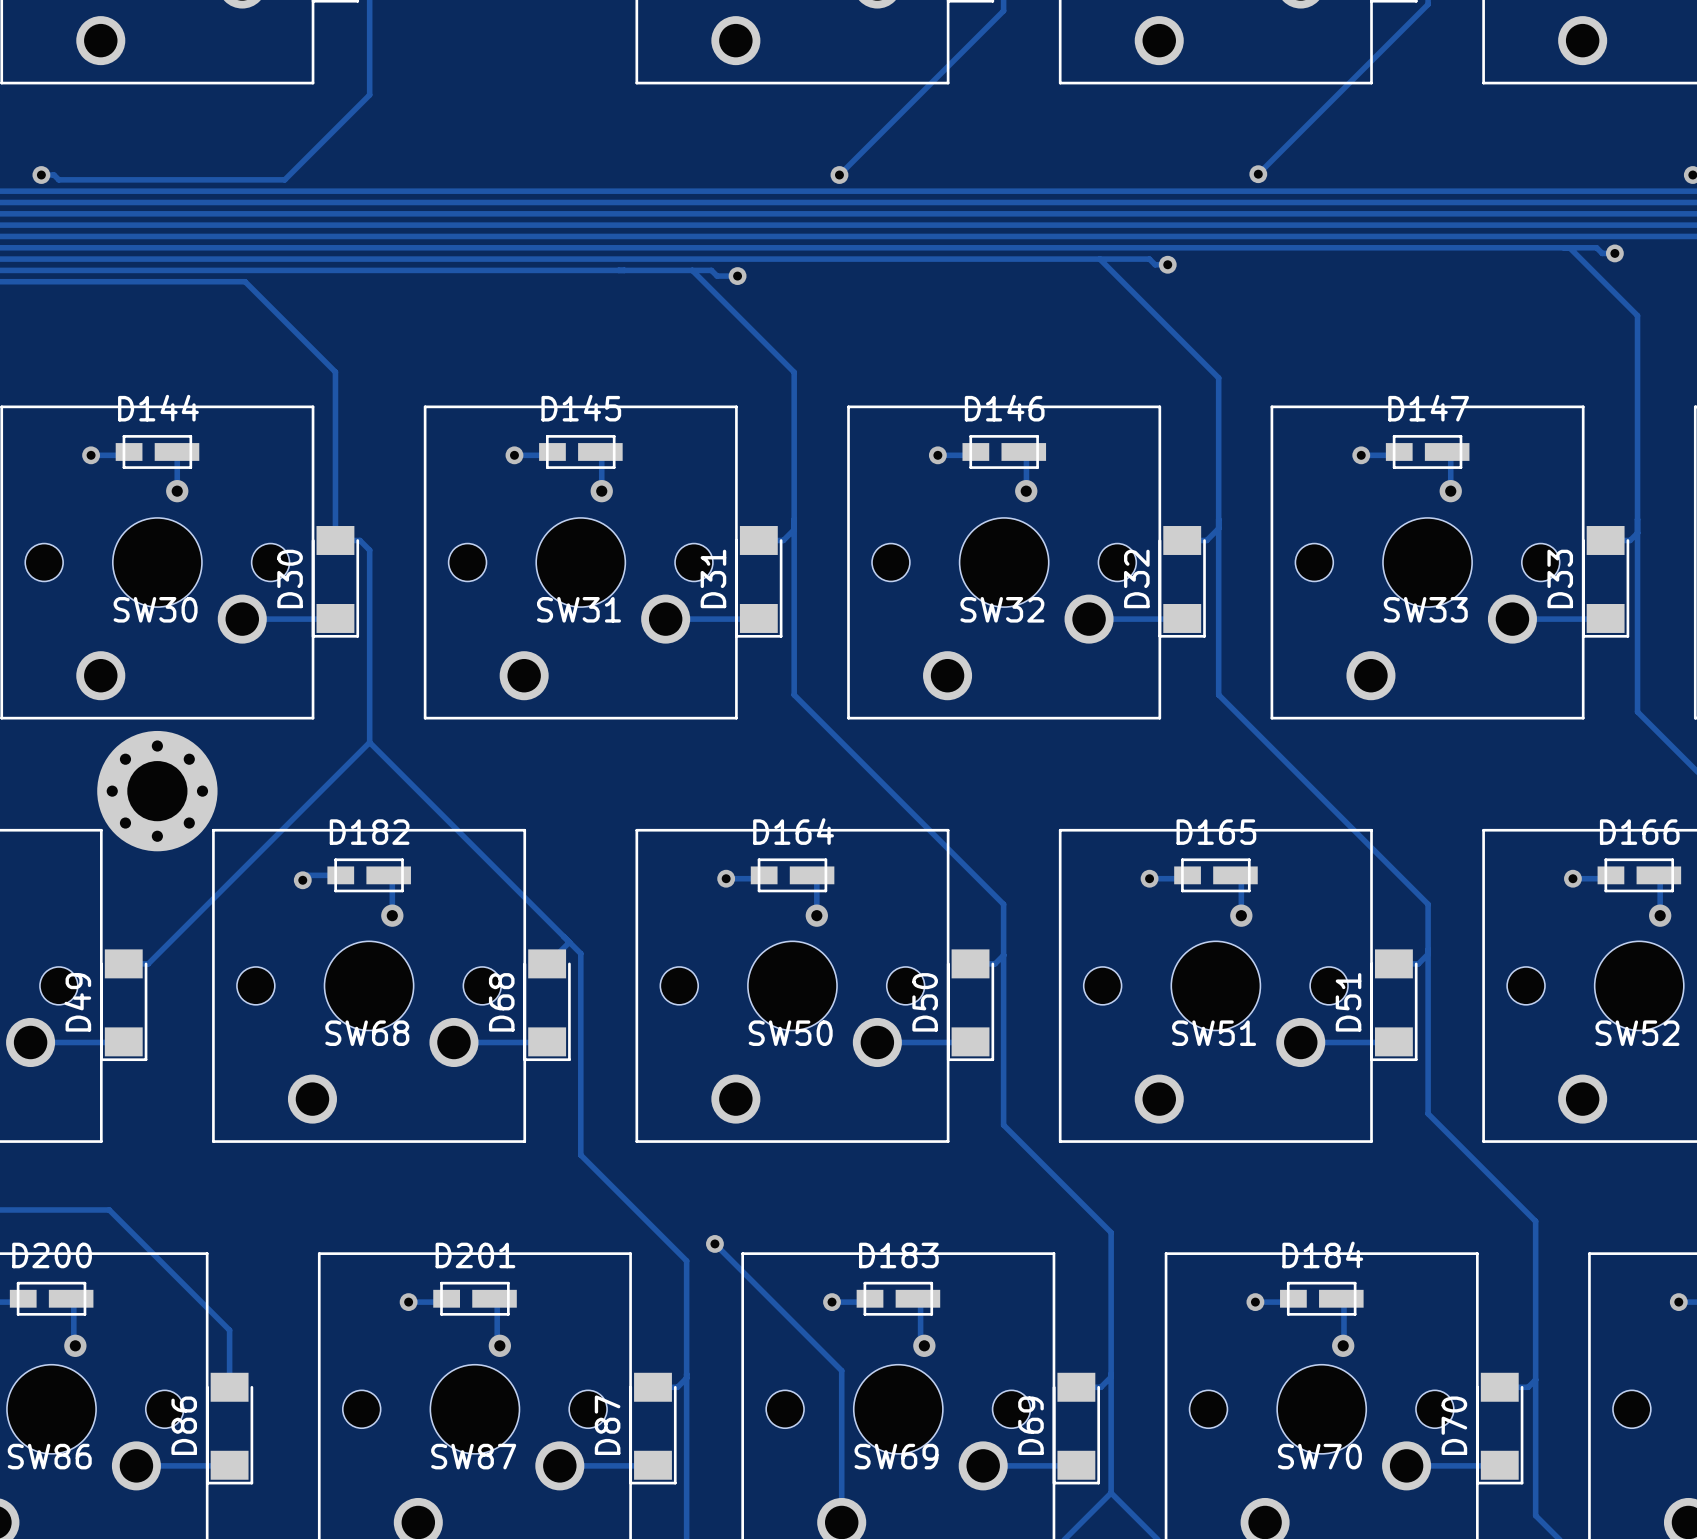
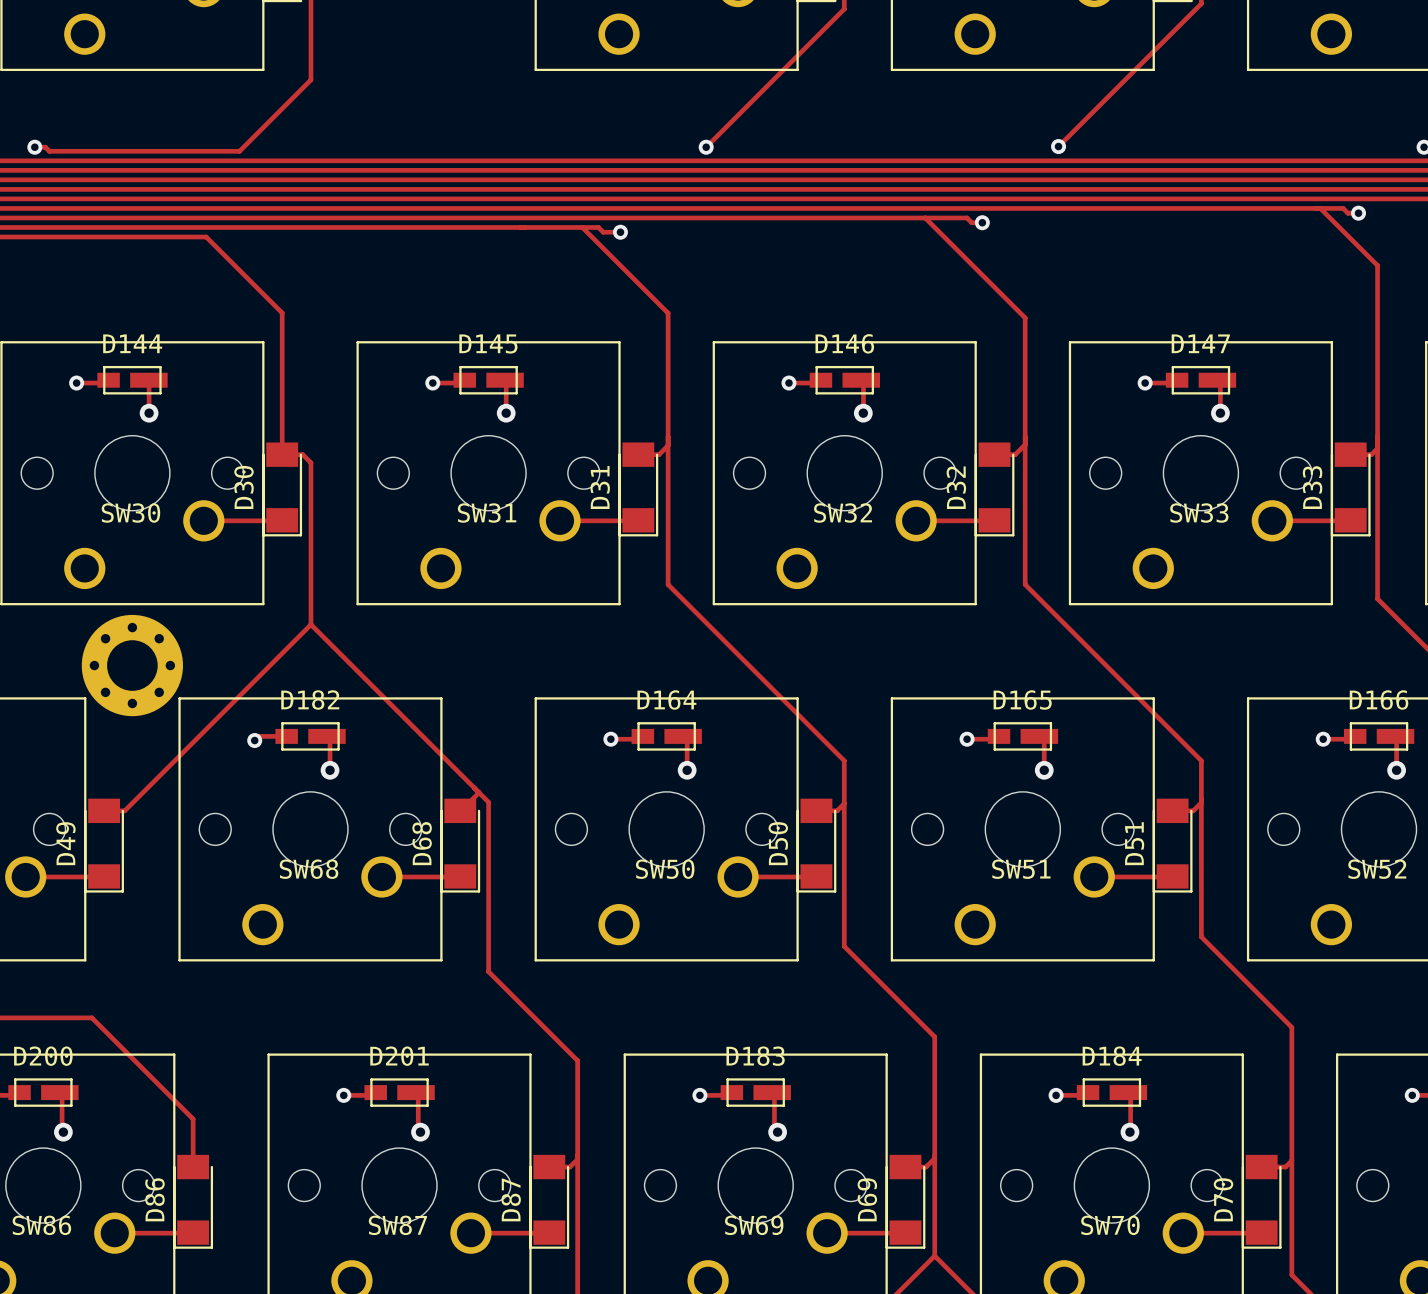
track: (714, 1243) (841, 1370) (841, 1522) -> none
via: (714, 1243) -> none

